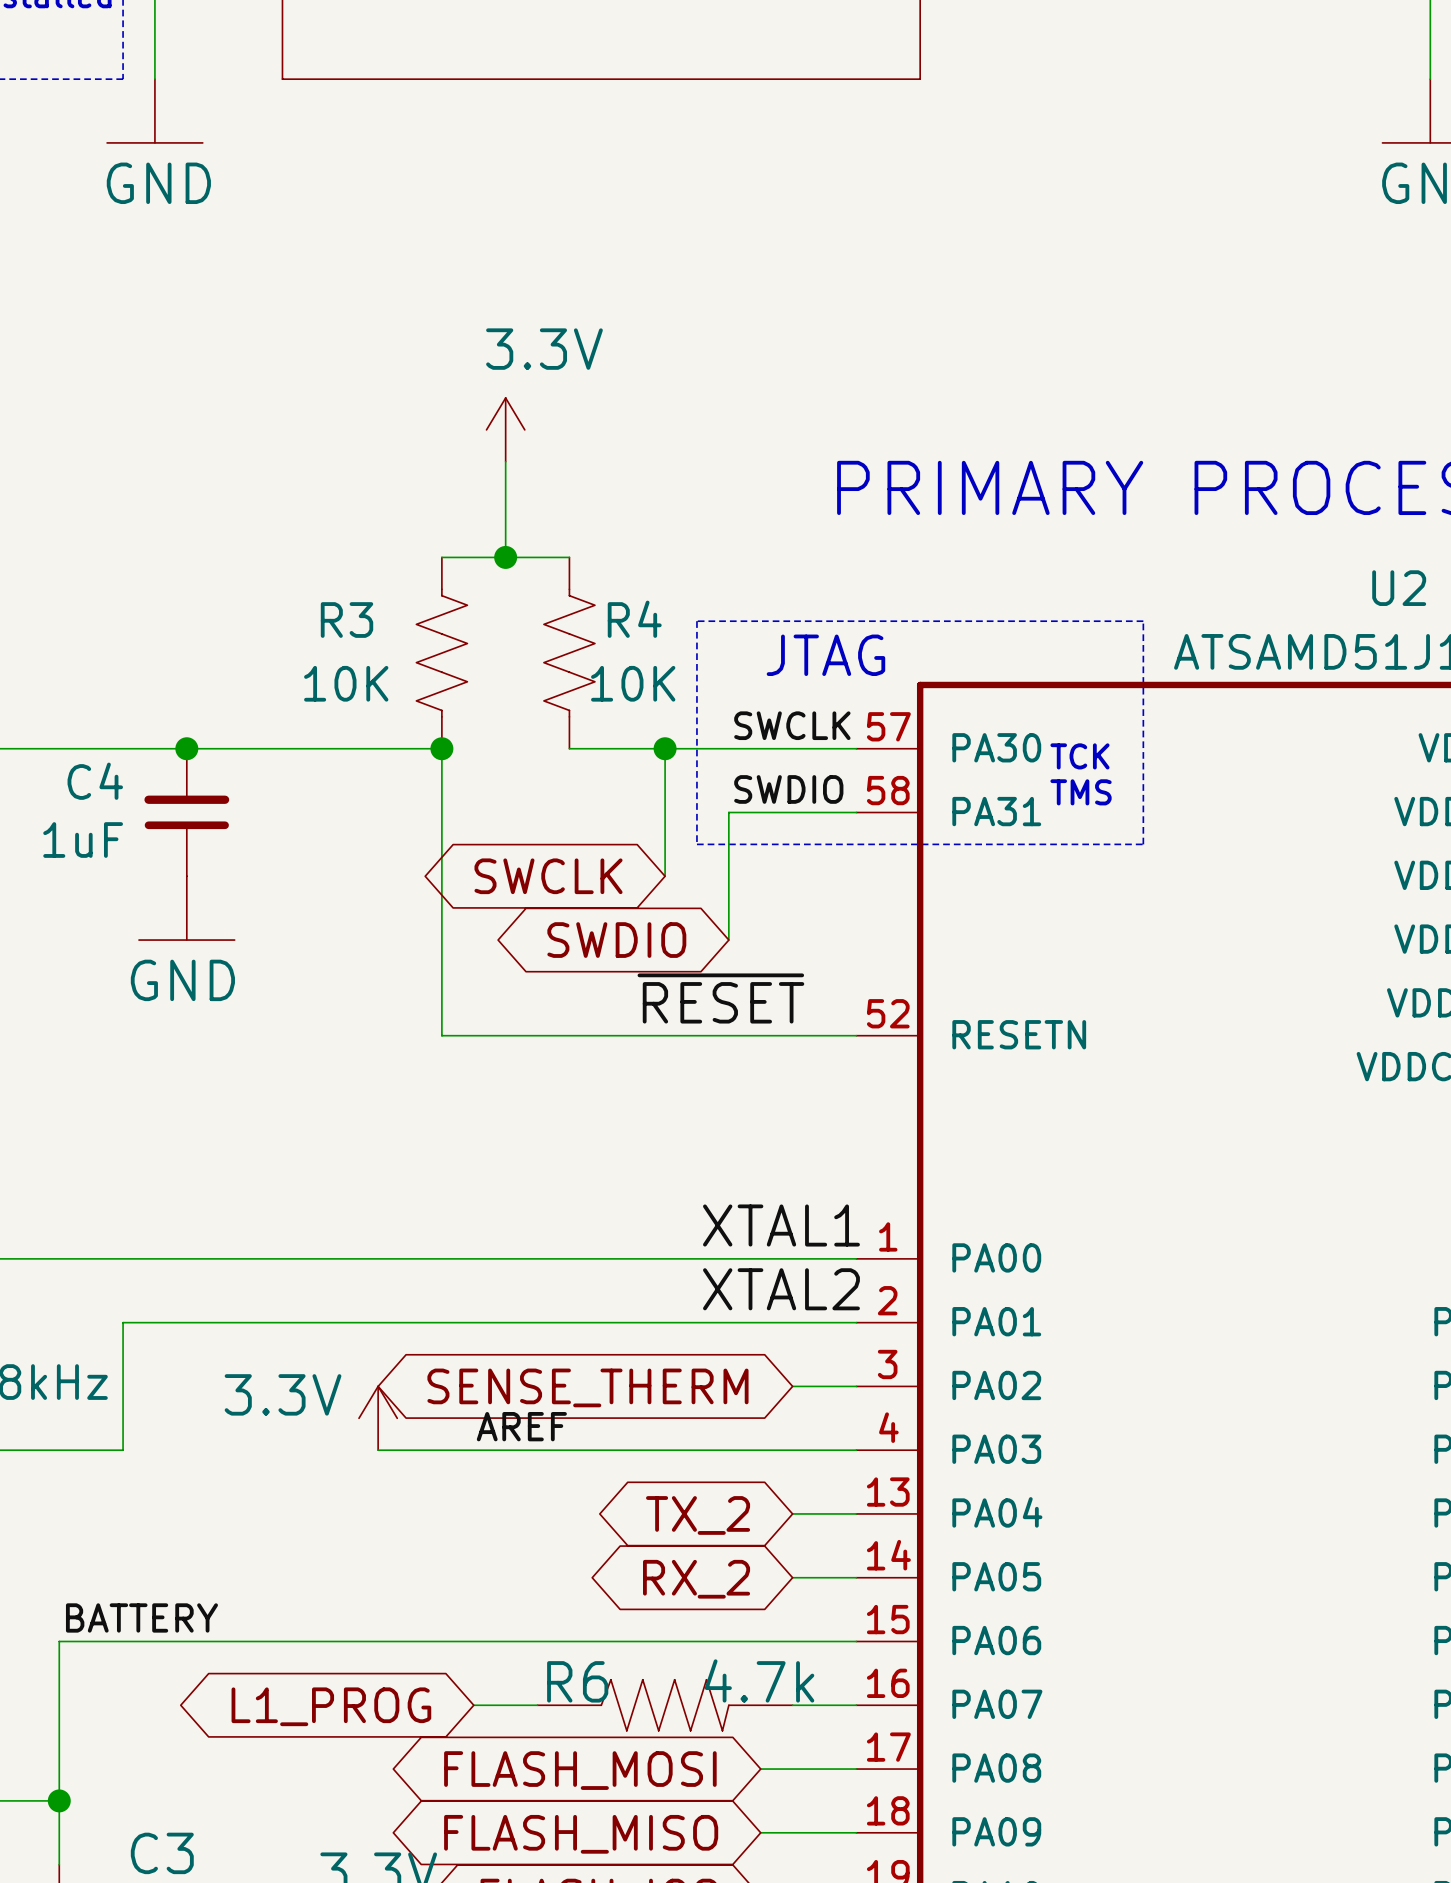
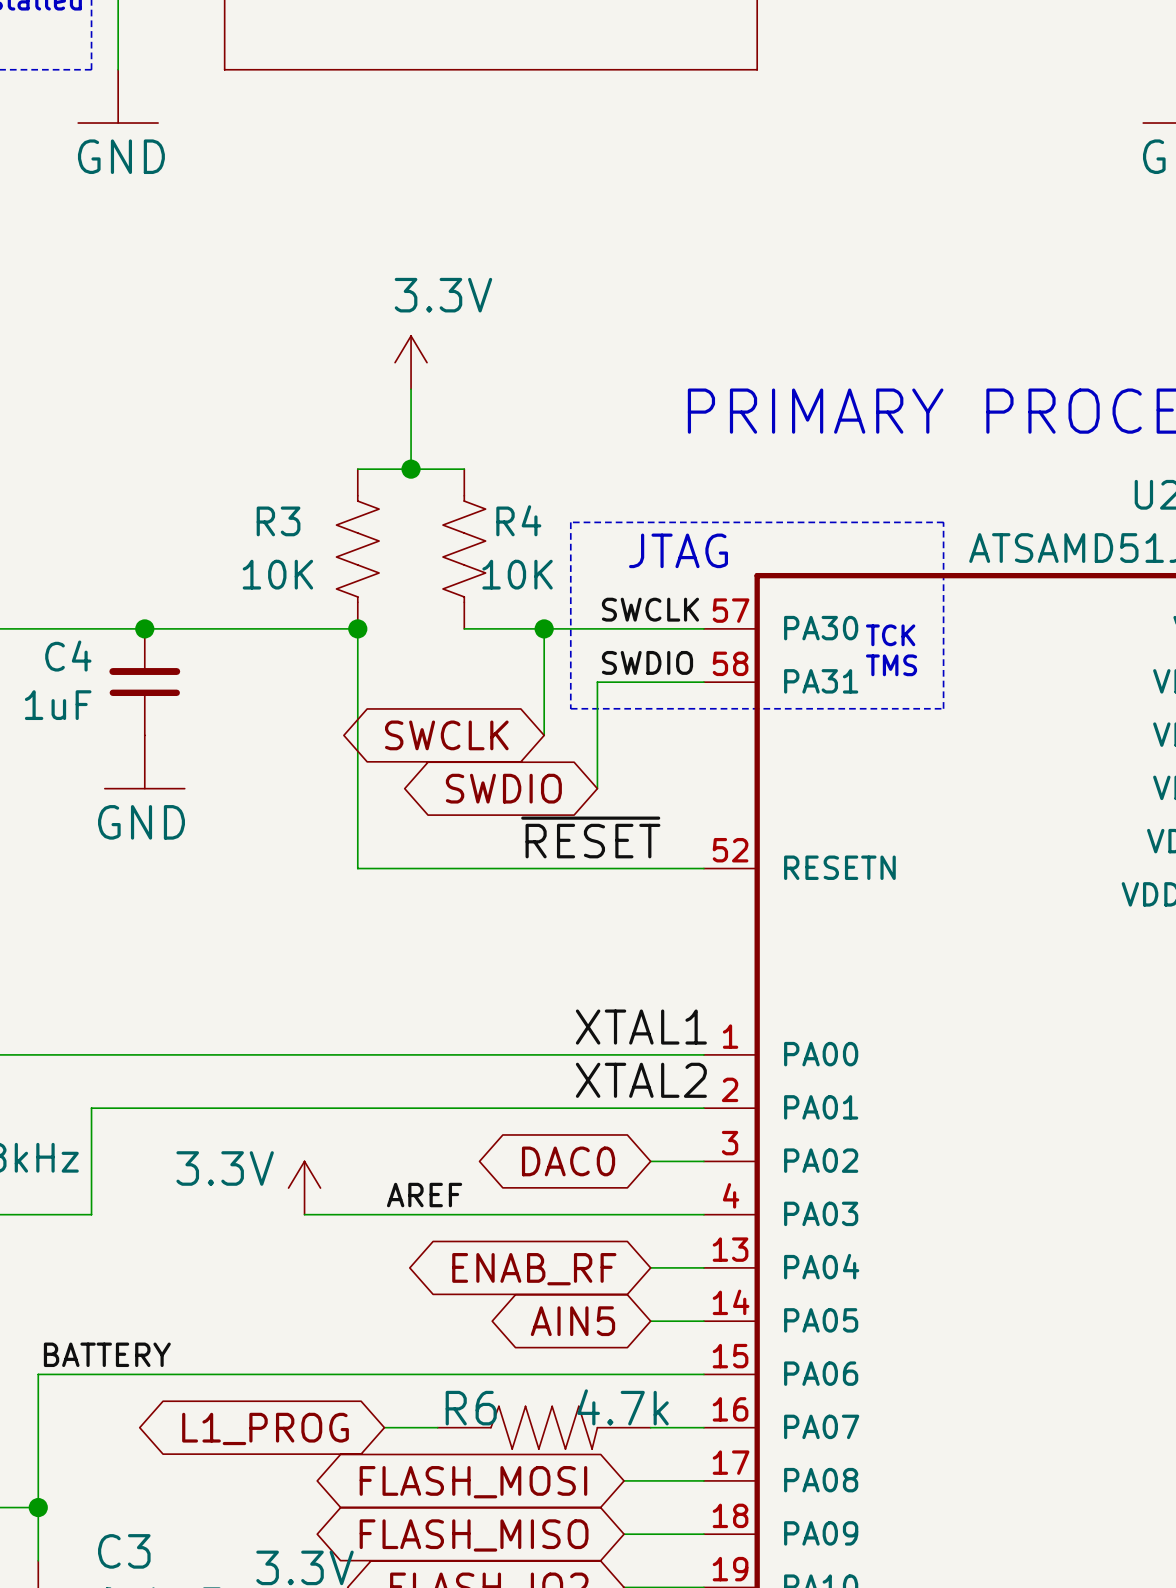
global label: SENSE_THERM (587, 1387) -> DAC0 (568, 1161)
global label: TX_2 (698, 1515) -> ENAB_RF (534, 1269)
global label: RX_2 (696, 1579) -> AIN5 (572, 1321)

